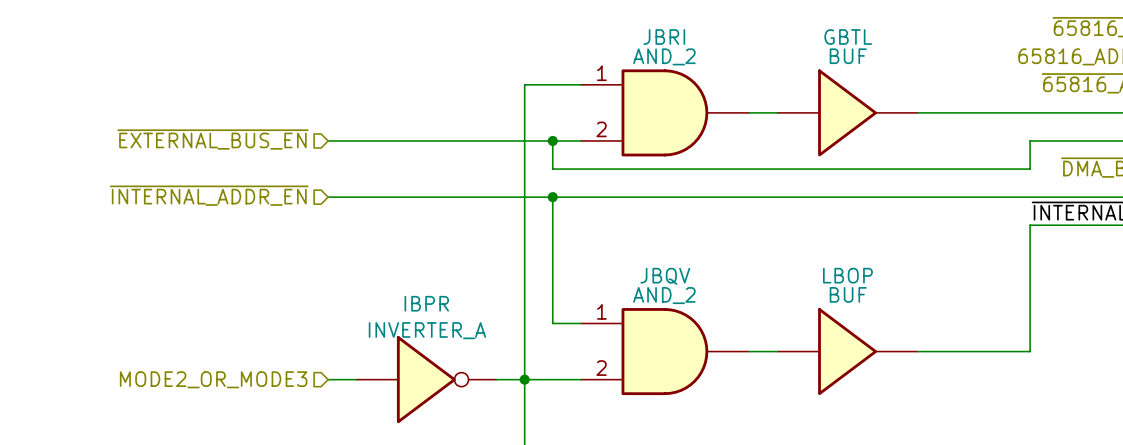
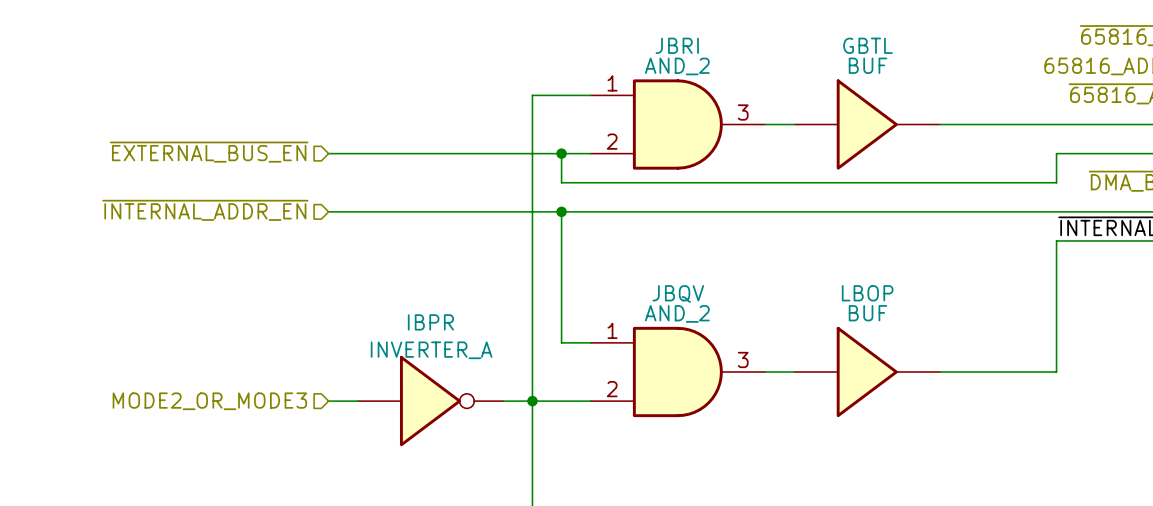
JBRI pin number: none -> 3 (743, 112)
JBQV pin number: none -> 3 (743, 359)

